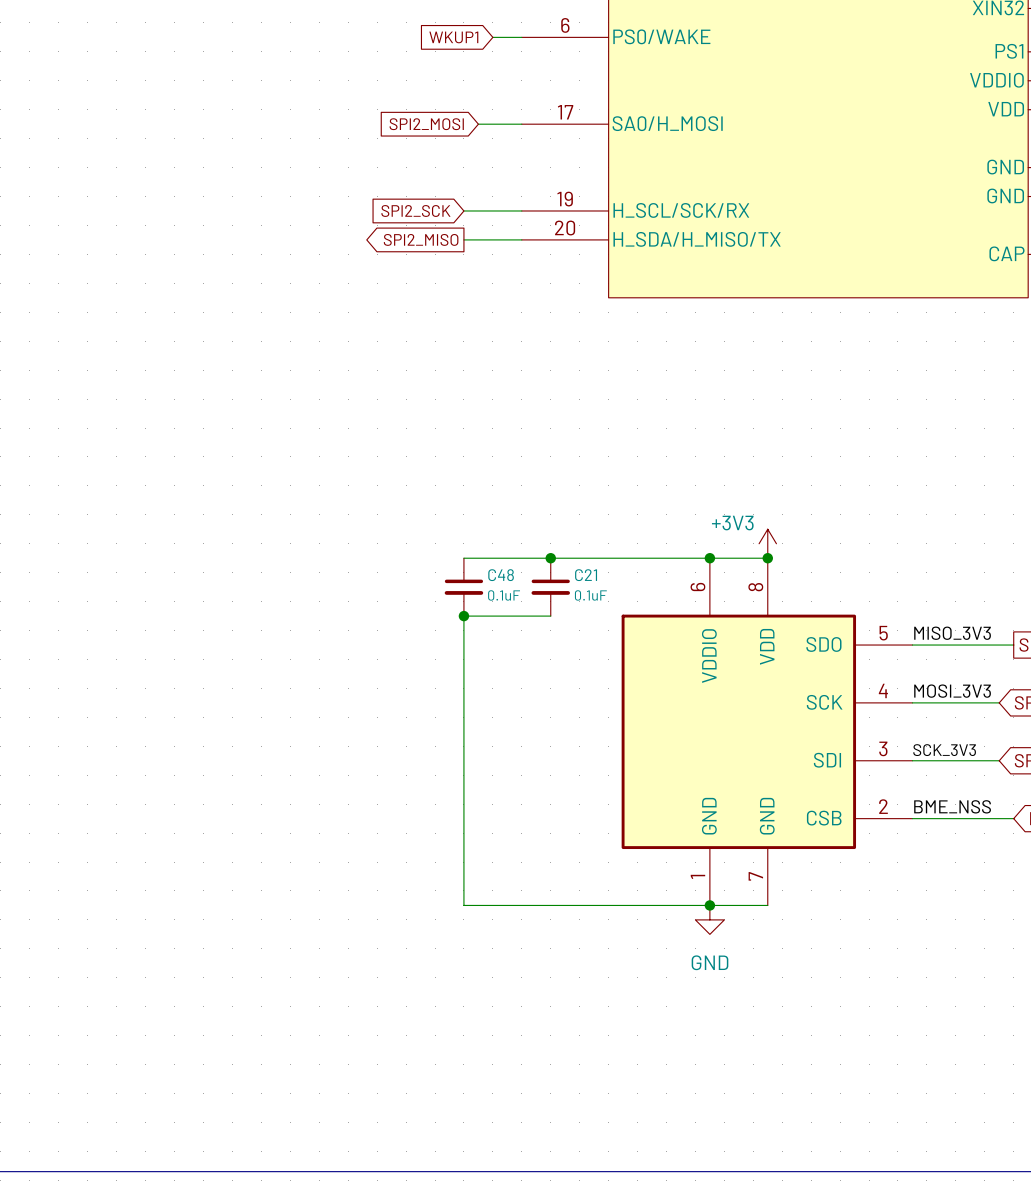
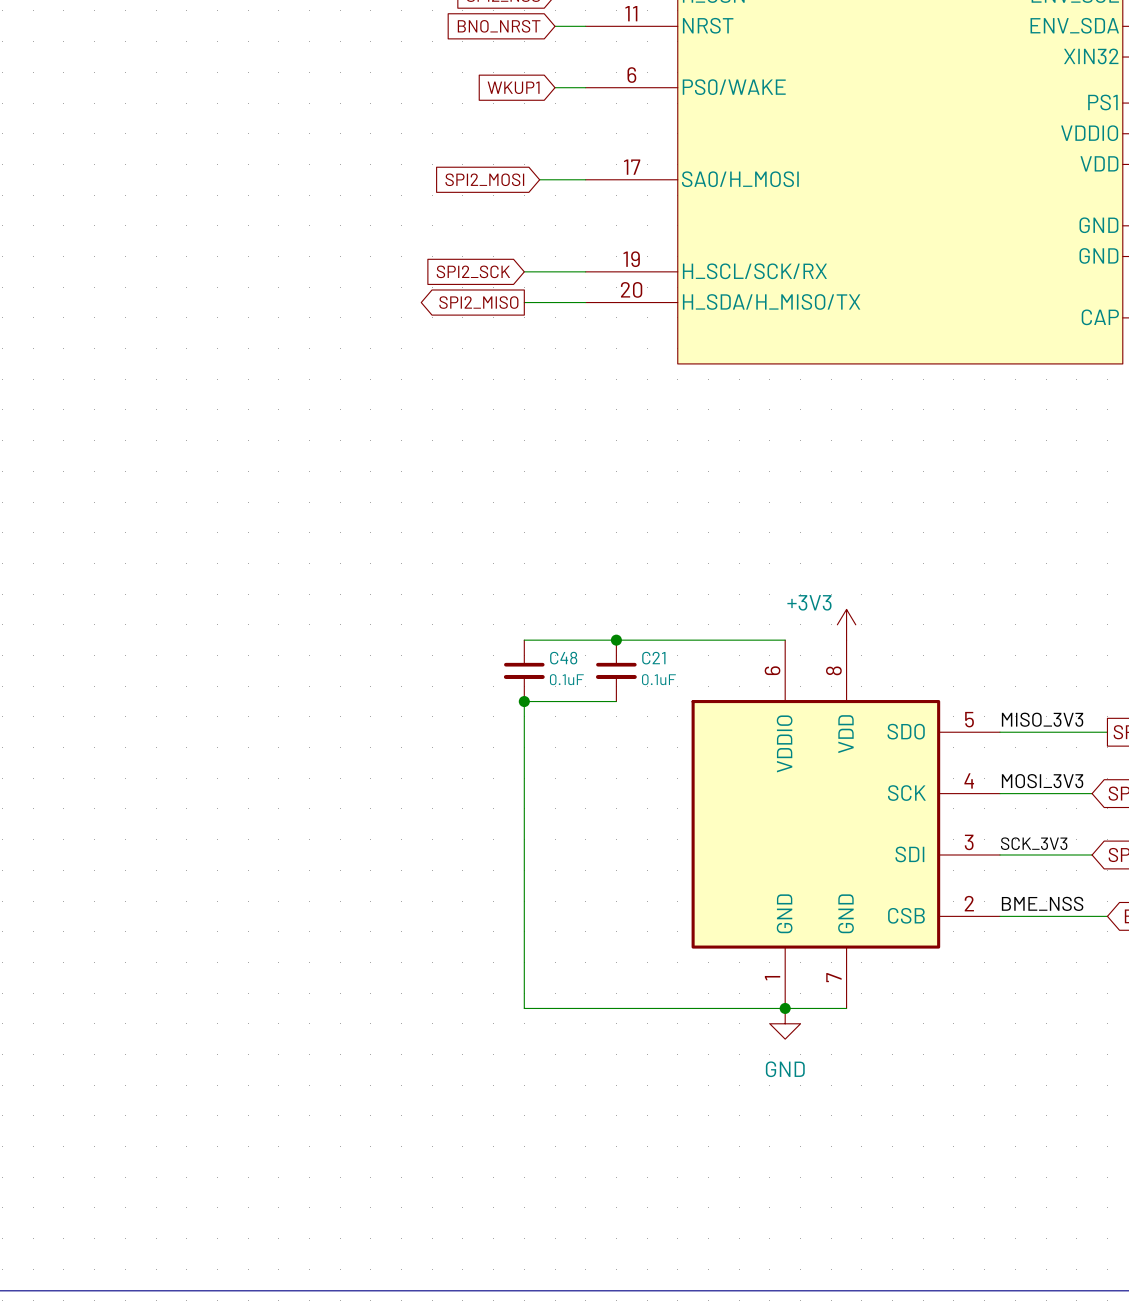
wire: (709, 558) (767, 558) -> none
junction: (709, 558) -> none
junction: (767, 558) -> none

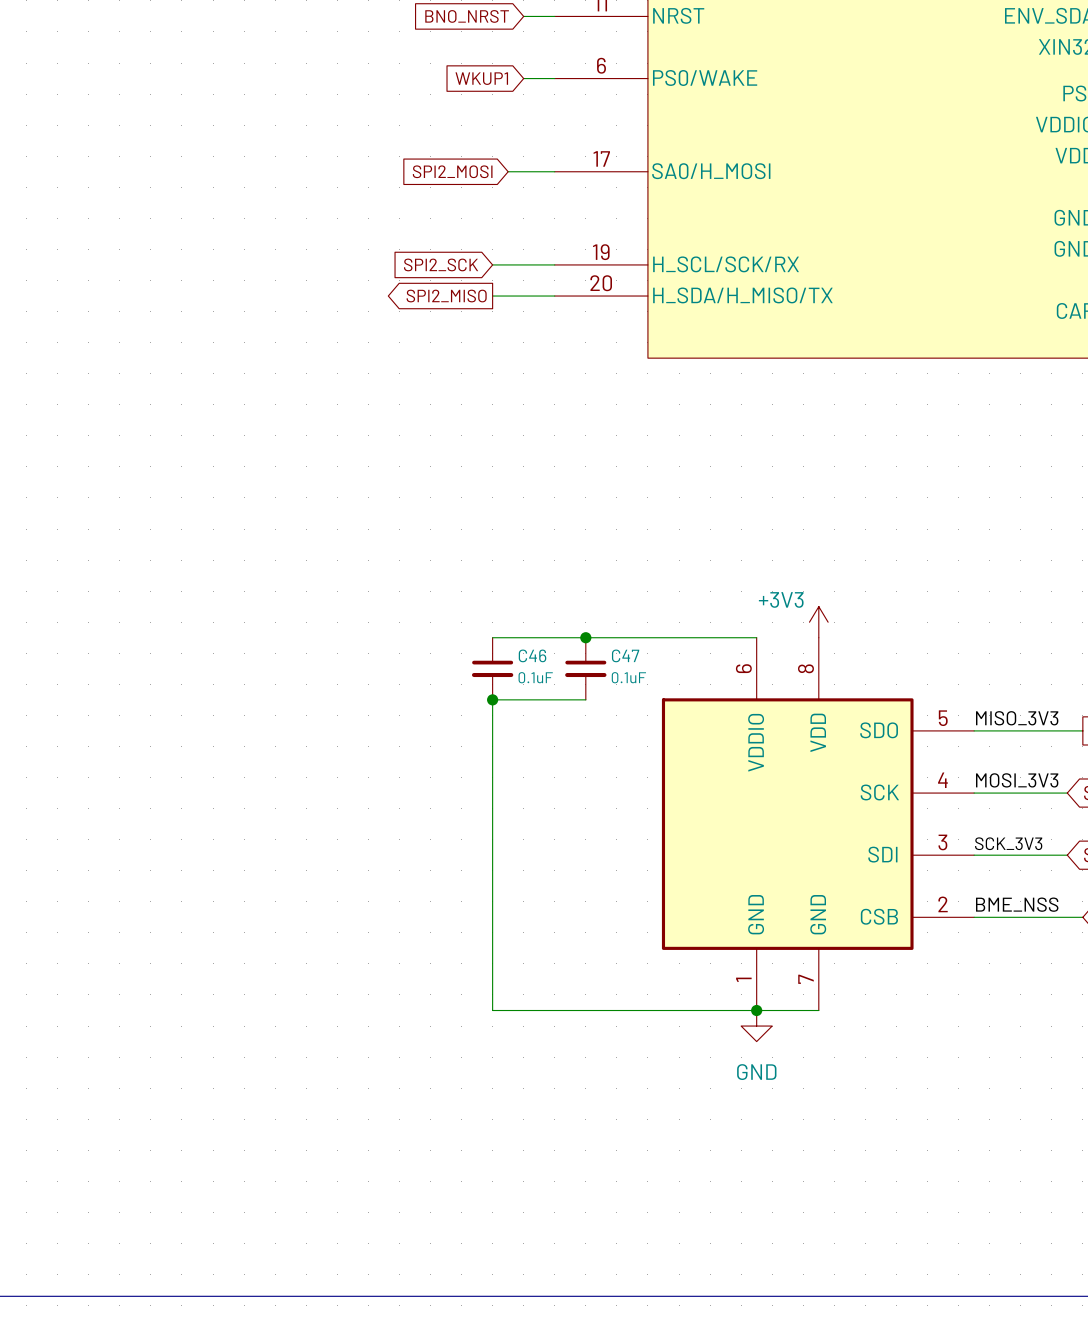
C48 name: C48 (563, 658) -> C46 (532, 655)
C21 name: C21 (653, 658) -> C47 (625, 655)

